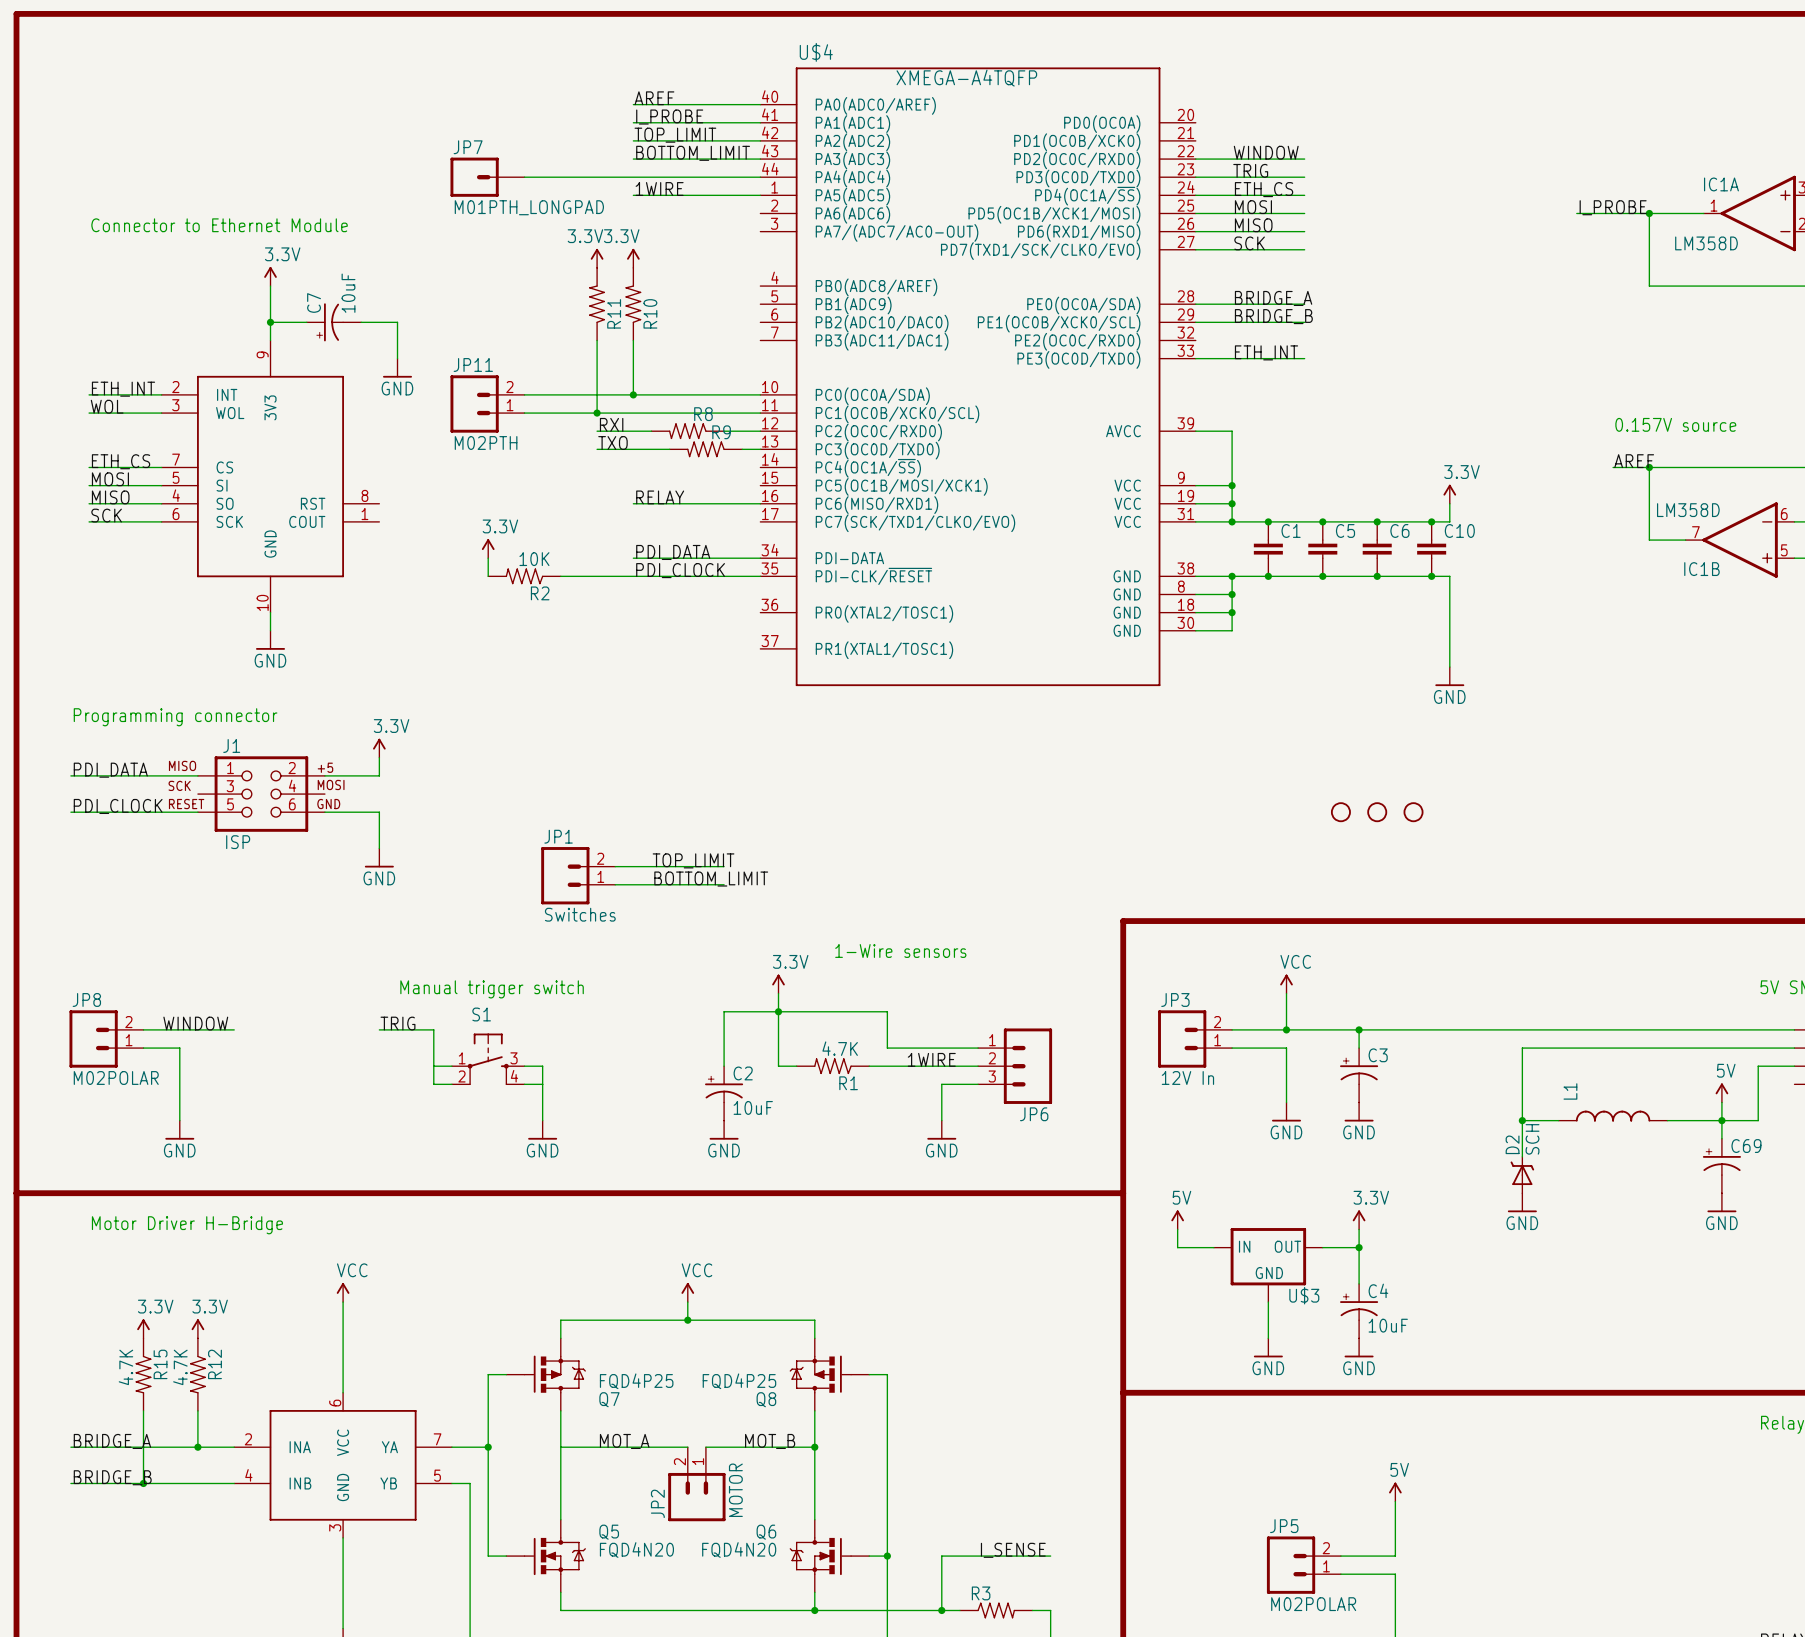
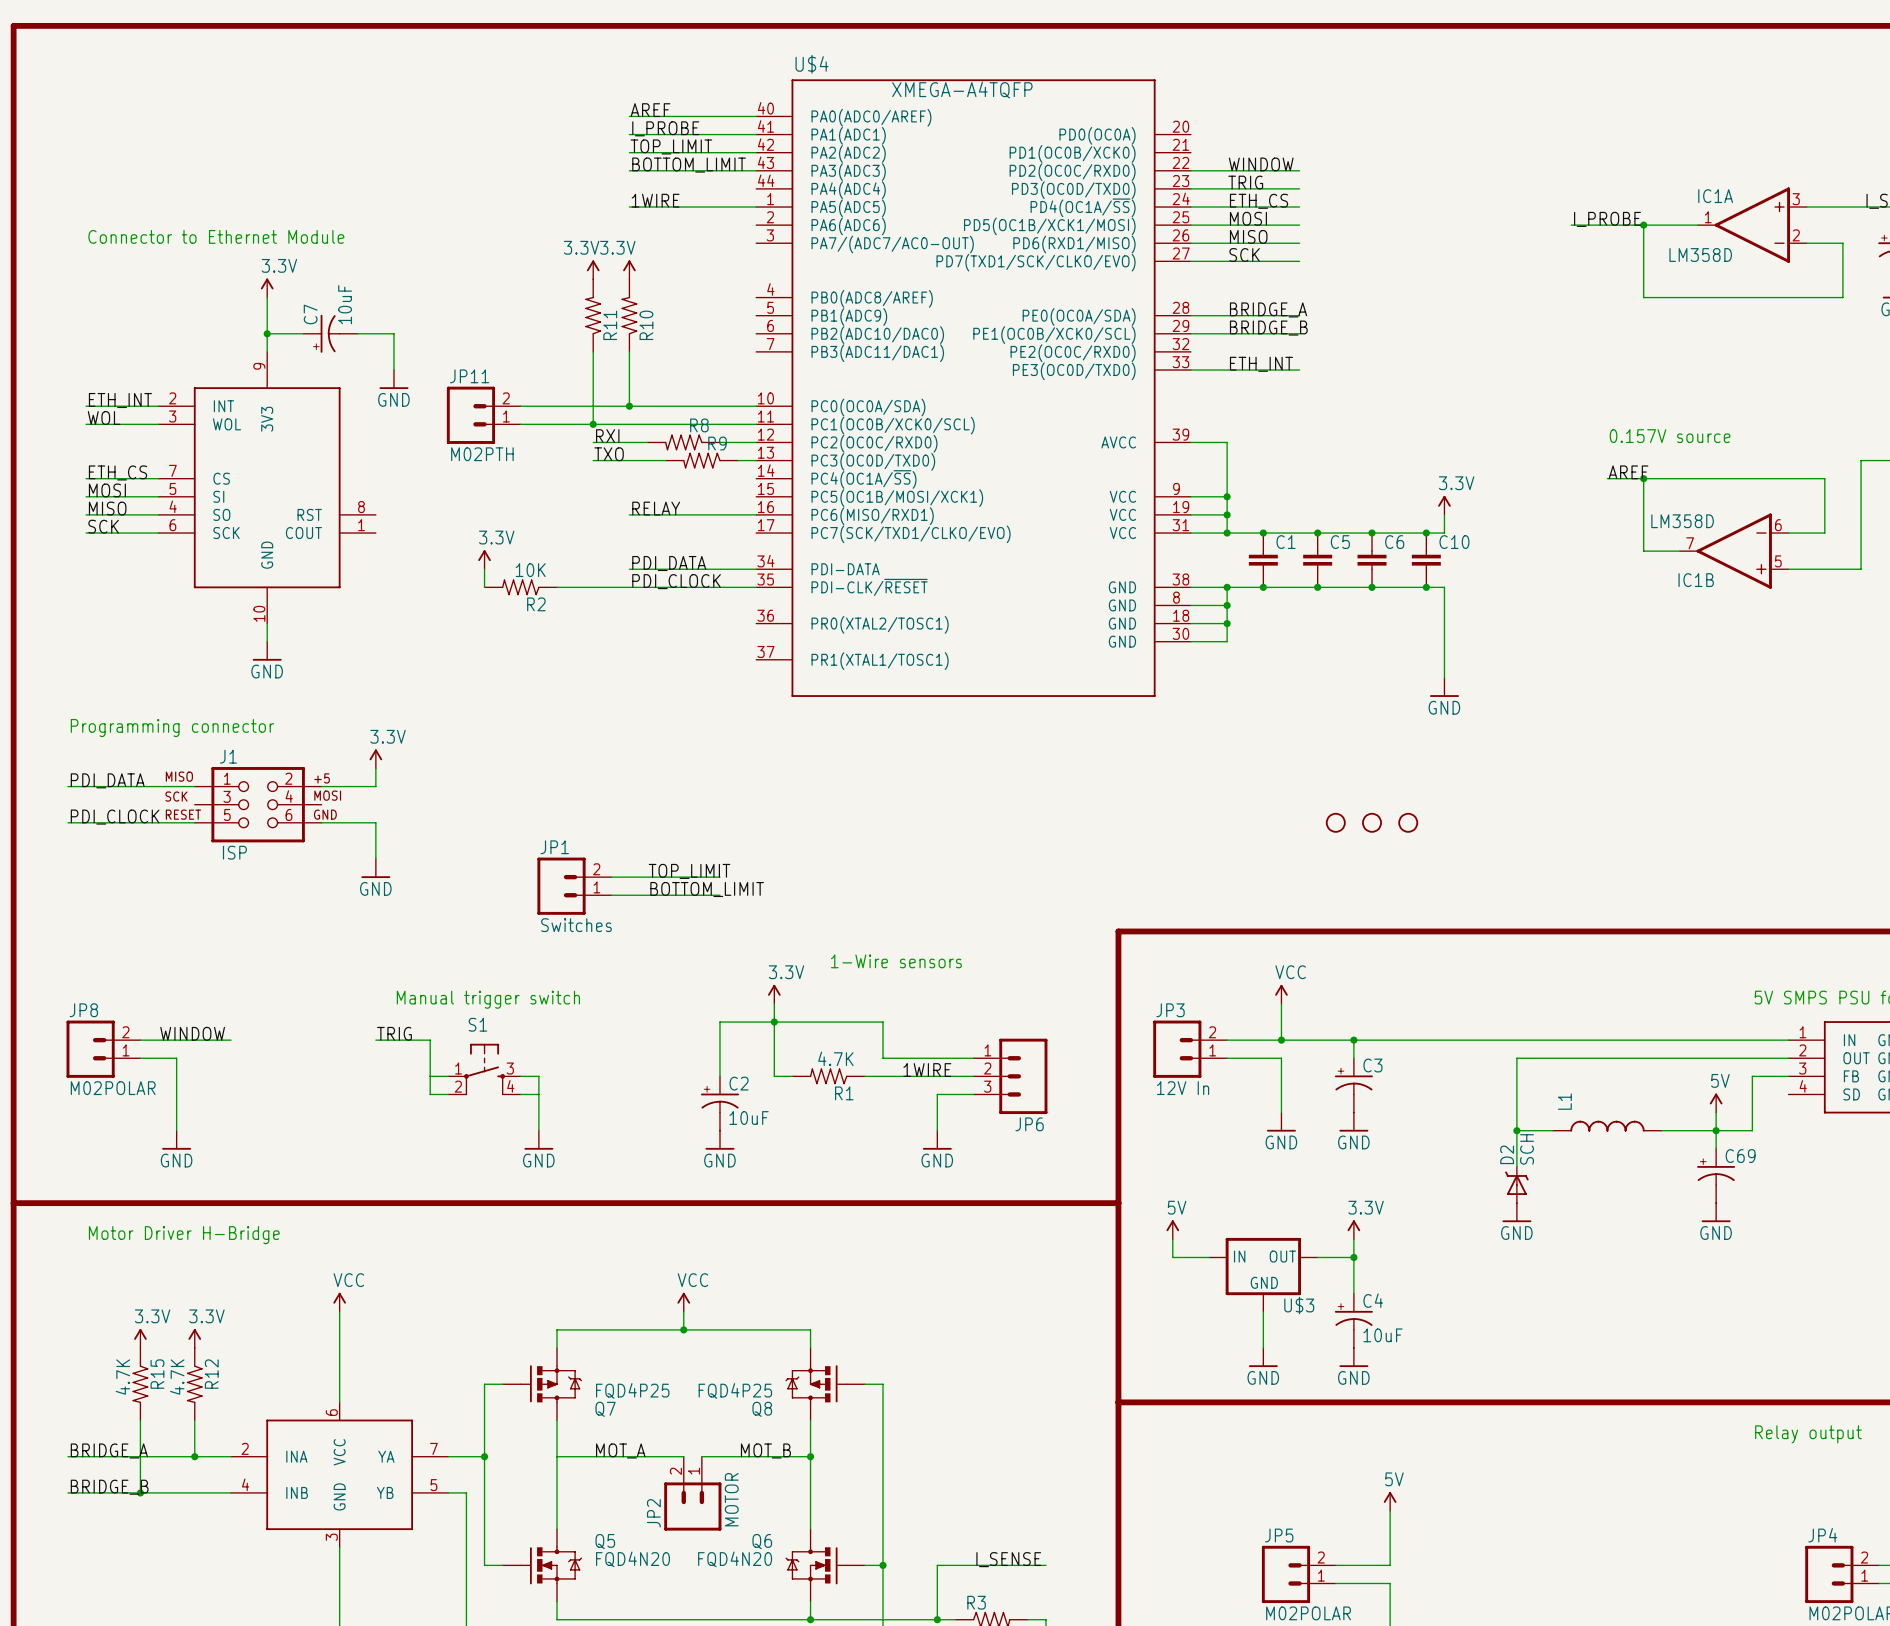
JP7: M01PTH_LONGPAD (487, 177) -> none
wire: (524, 177) (760, 177) -> none

